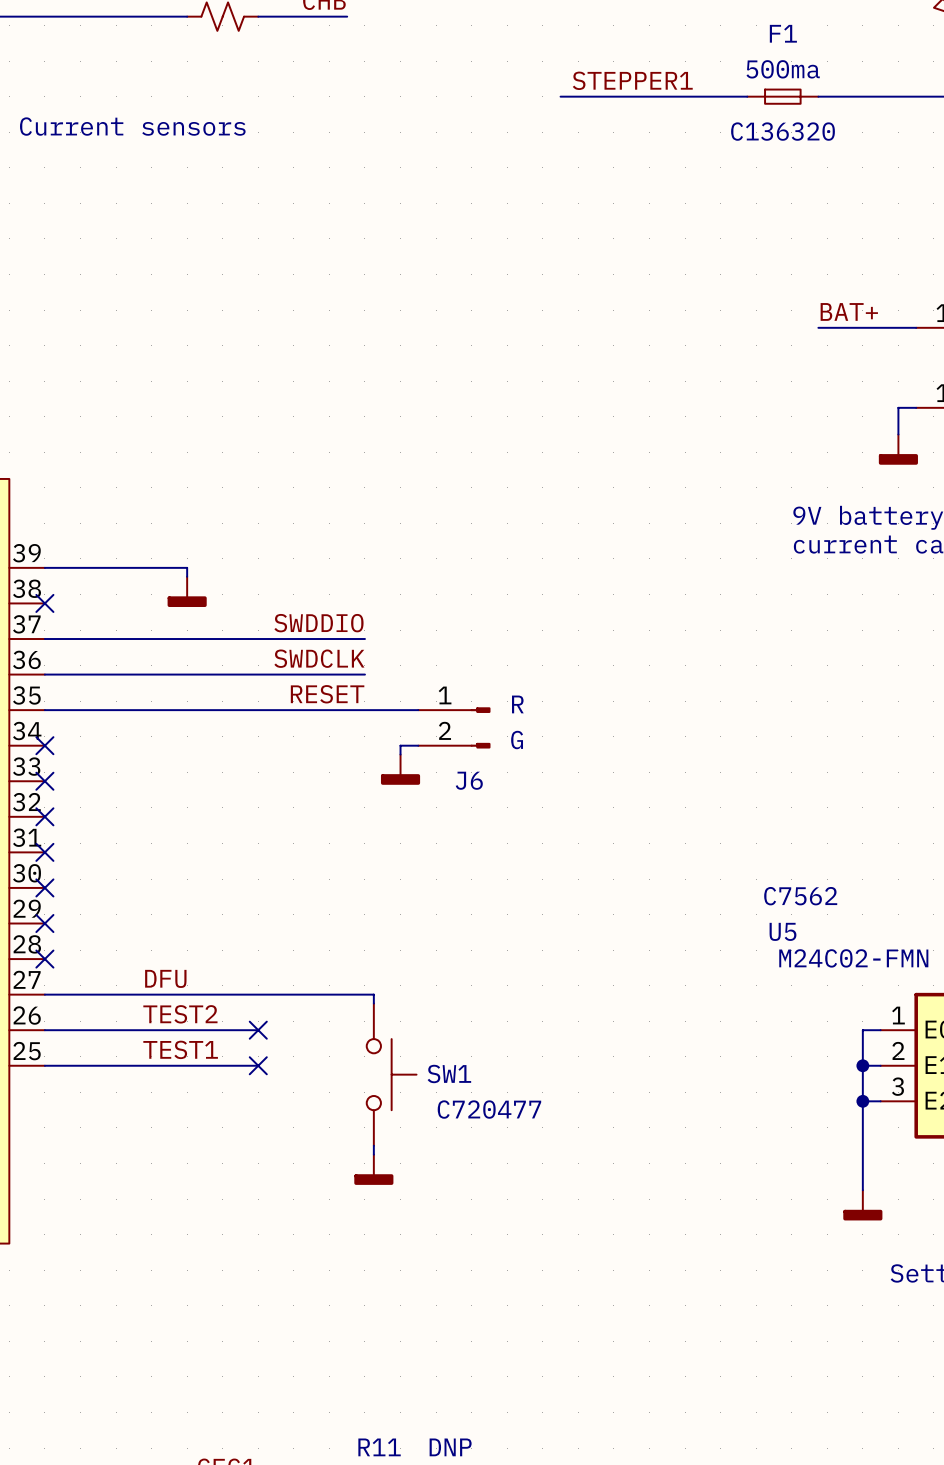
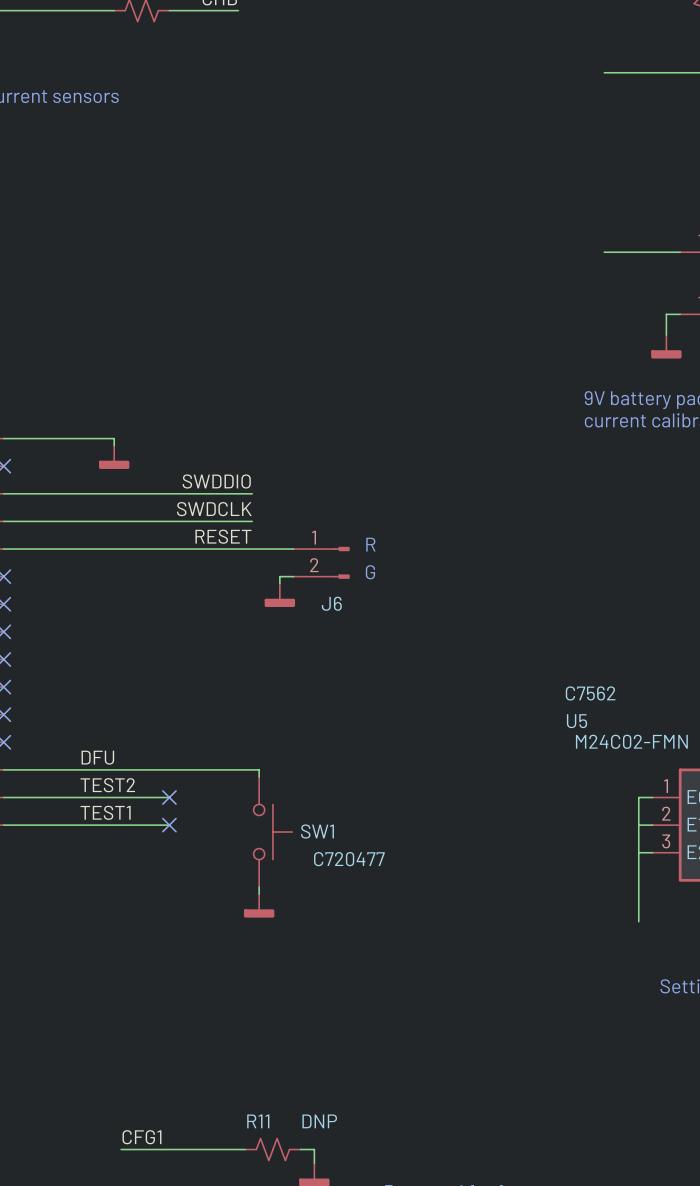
label: STEPPER1 (632, 80) -> none
wire: (560, 96) (747, 96) -> none
F1: 500ma (782, 96) -> none
label: BAT+ (849, 311) -> none
junction: (862, 1065) -> none
junction: (862, 1101) -> none
power symbol: (862, 1205) -> none

